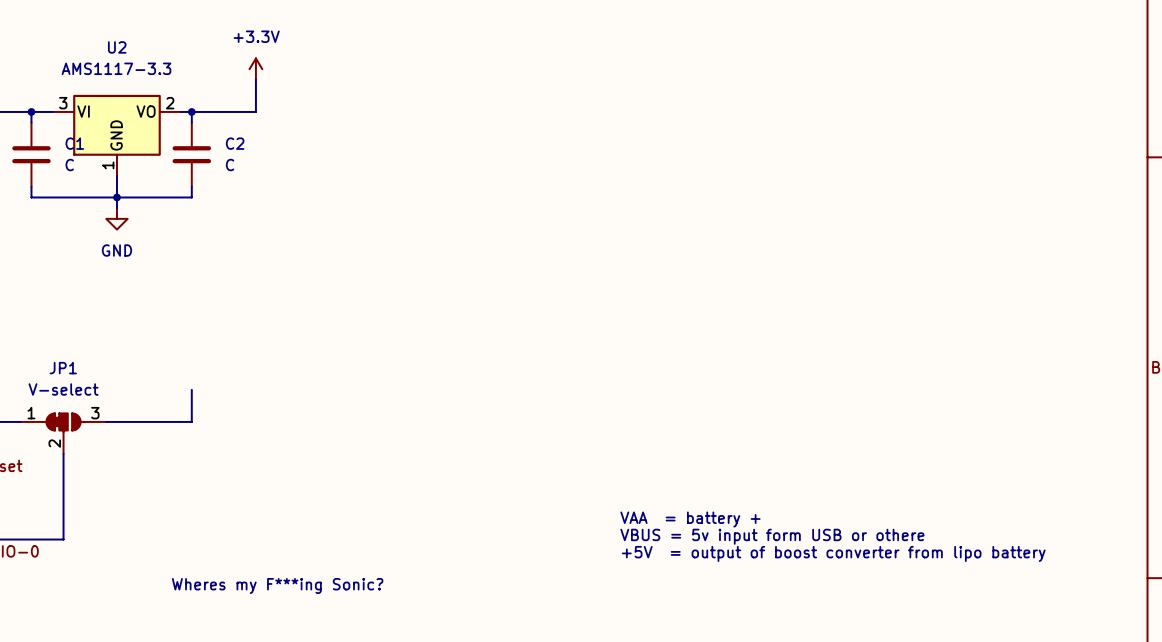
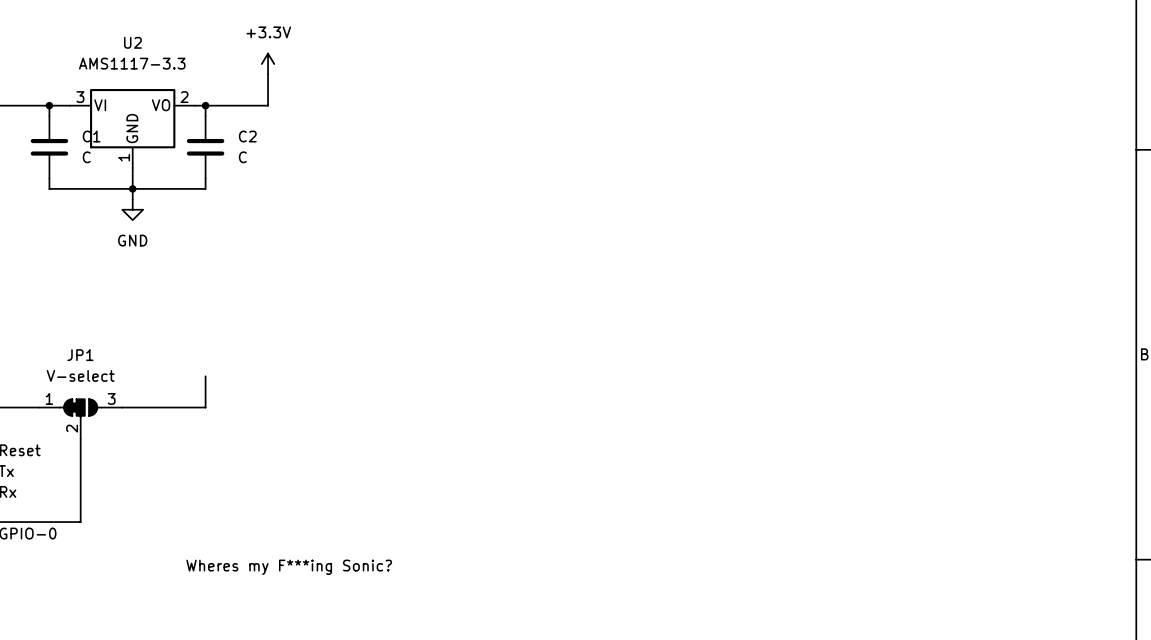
text: VAA = battery + (690, 519) -> none
text: VBUS = 5v input form USB or othere (772, 536) -> none
text: +5V = output of boost converter from lipo battery (833, 553) -> none

